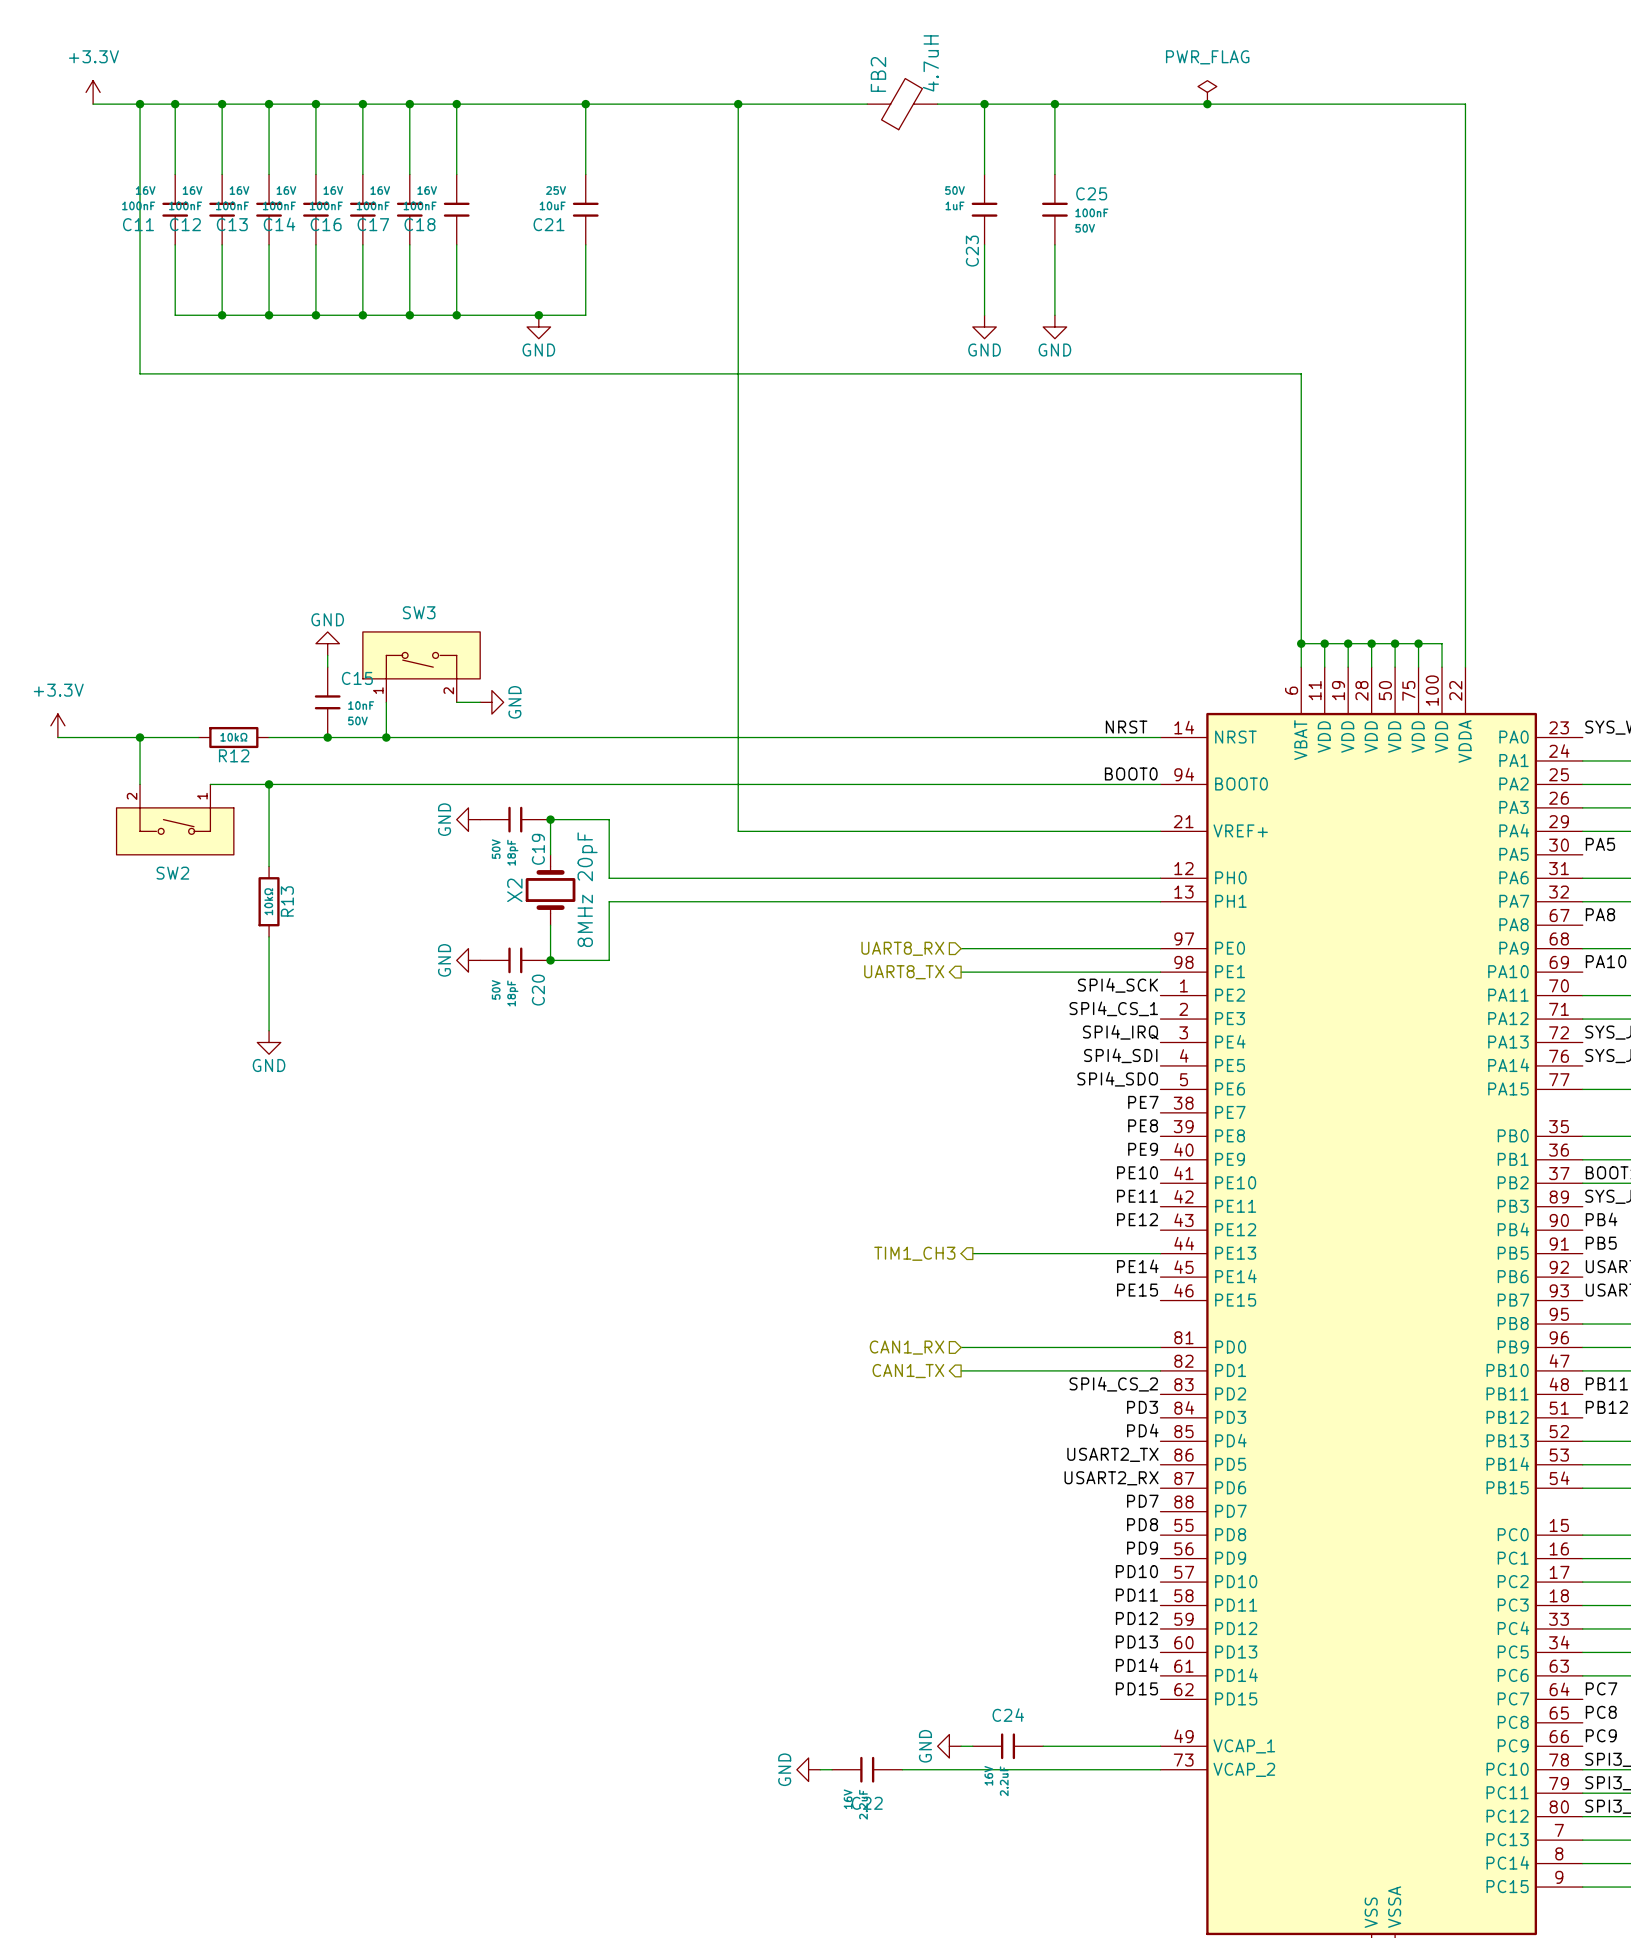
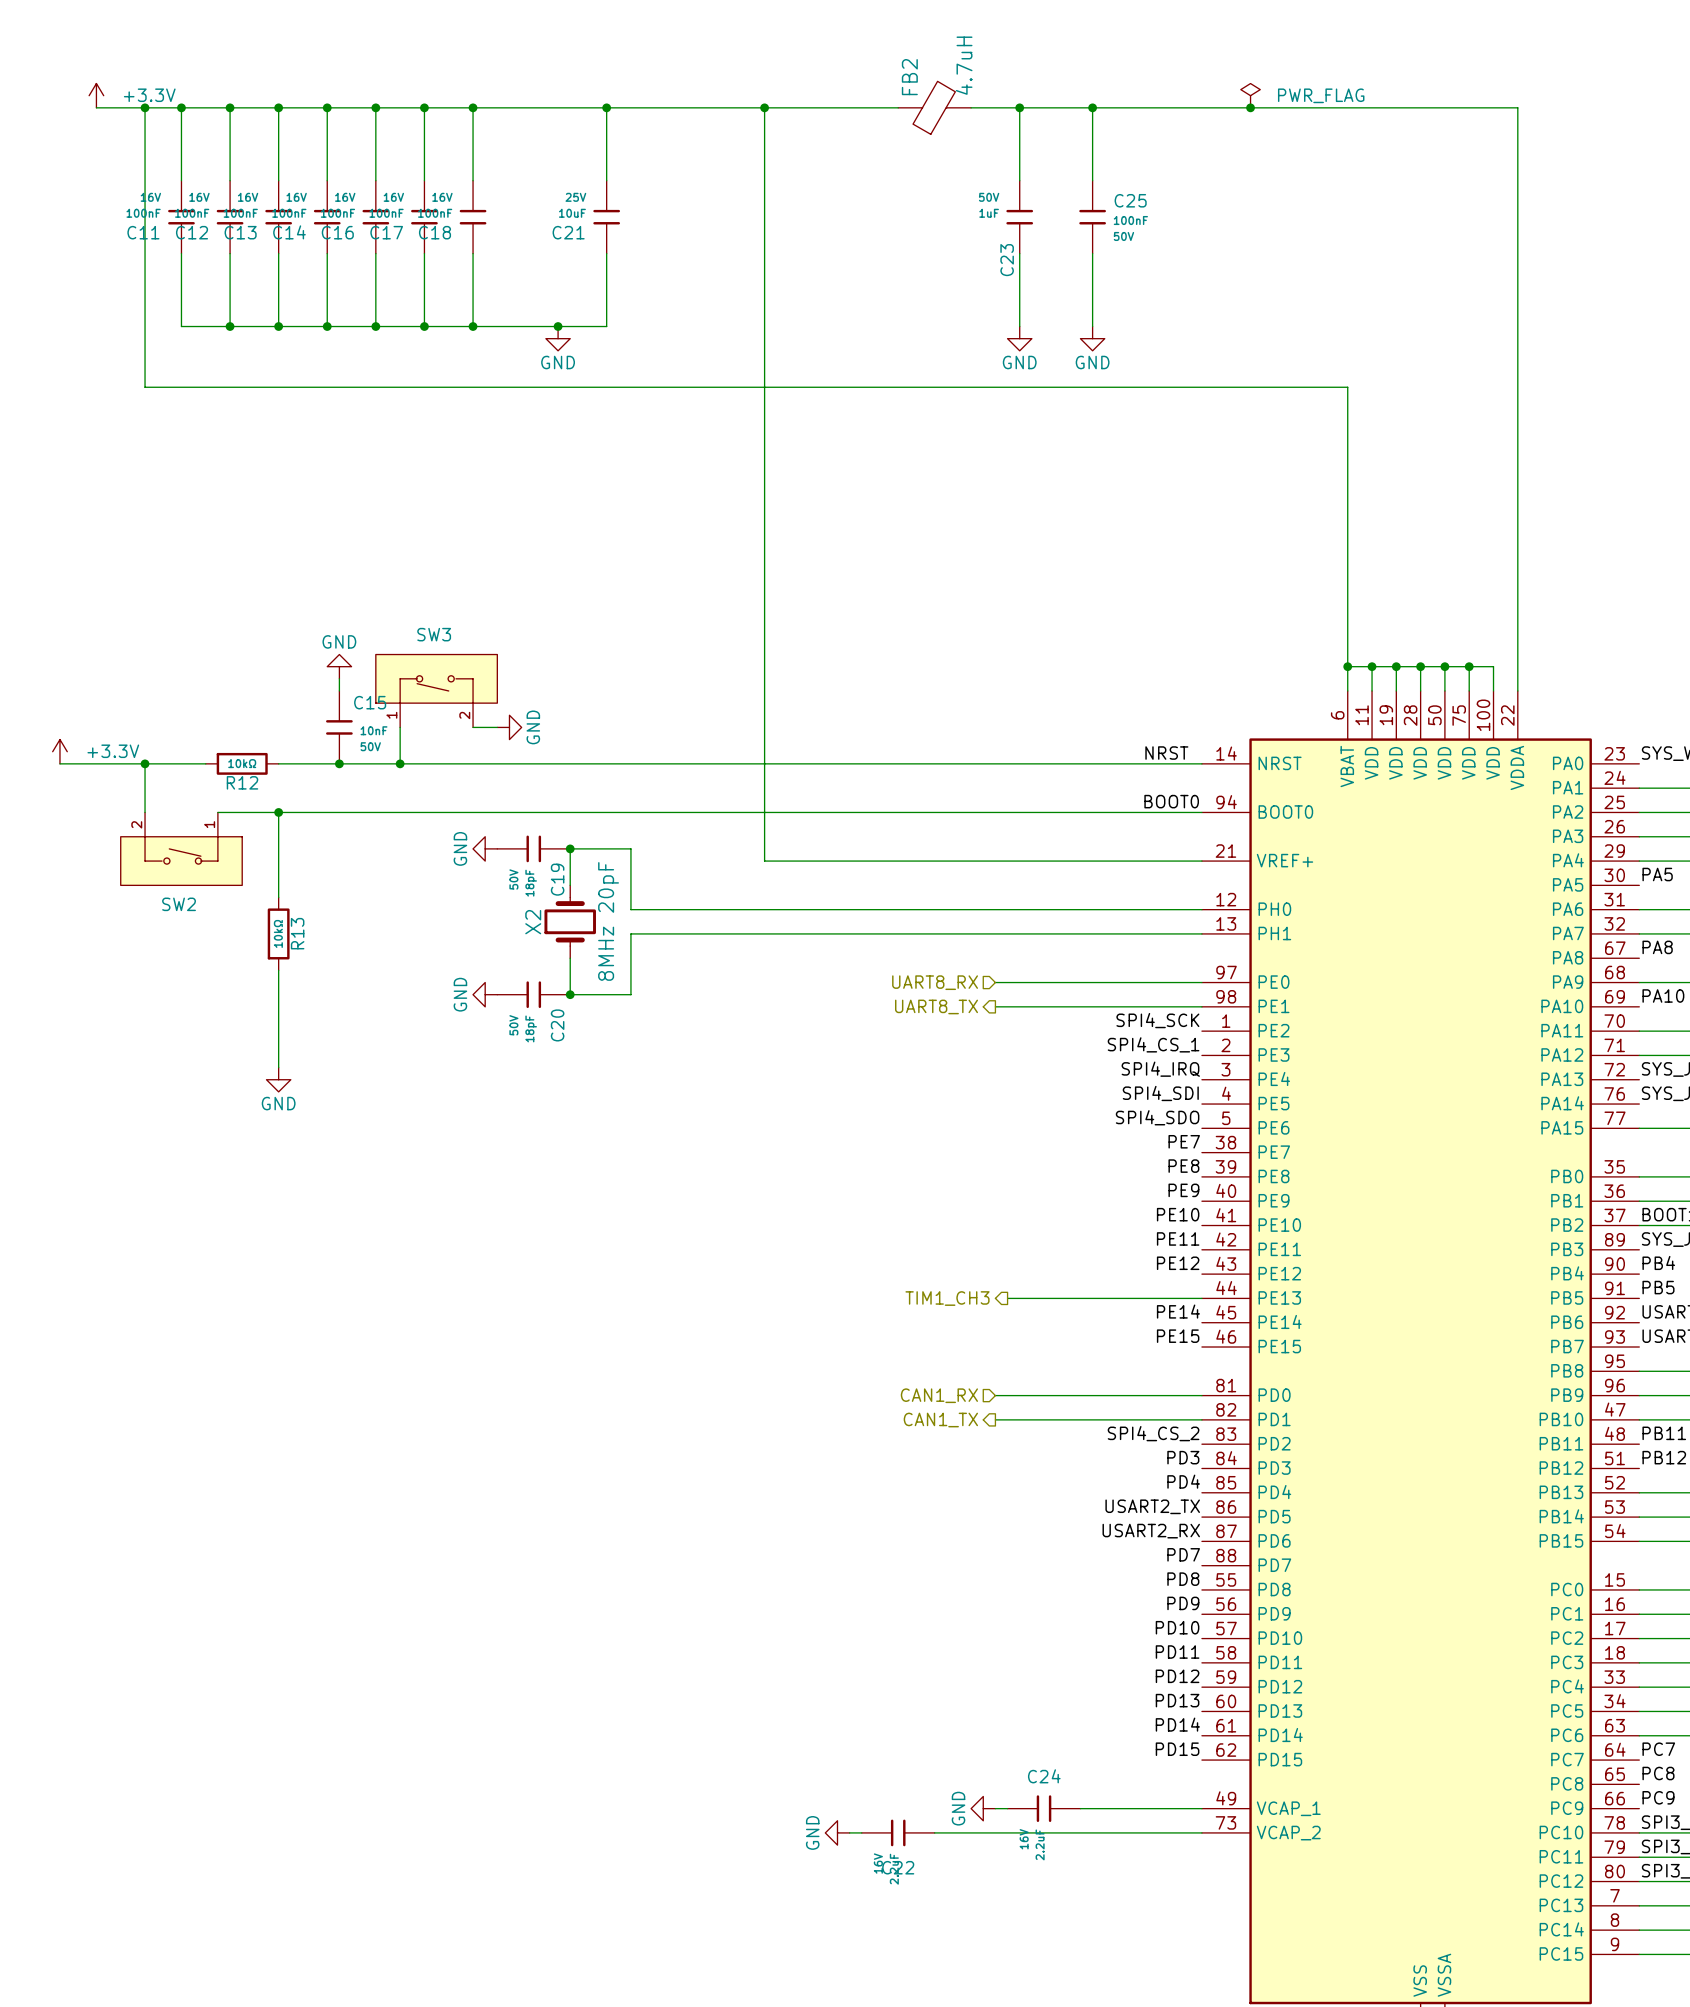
power symbol text position: +3.3V (93, 56) -> +3.3V (149, 95)
power symbol text position: PWR_FLAG (1207, 57) -> PWR_FLAG (1321, 95)
power symbol text position: +3.3V (58, 690) -> +3.3V (113, 751)

